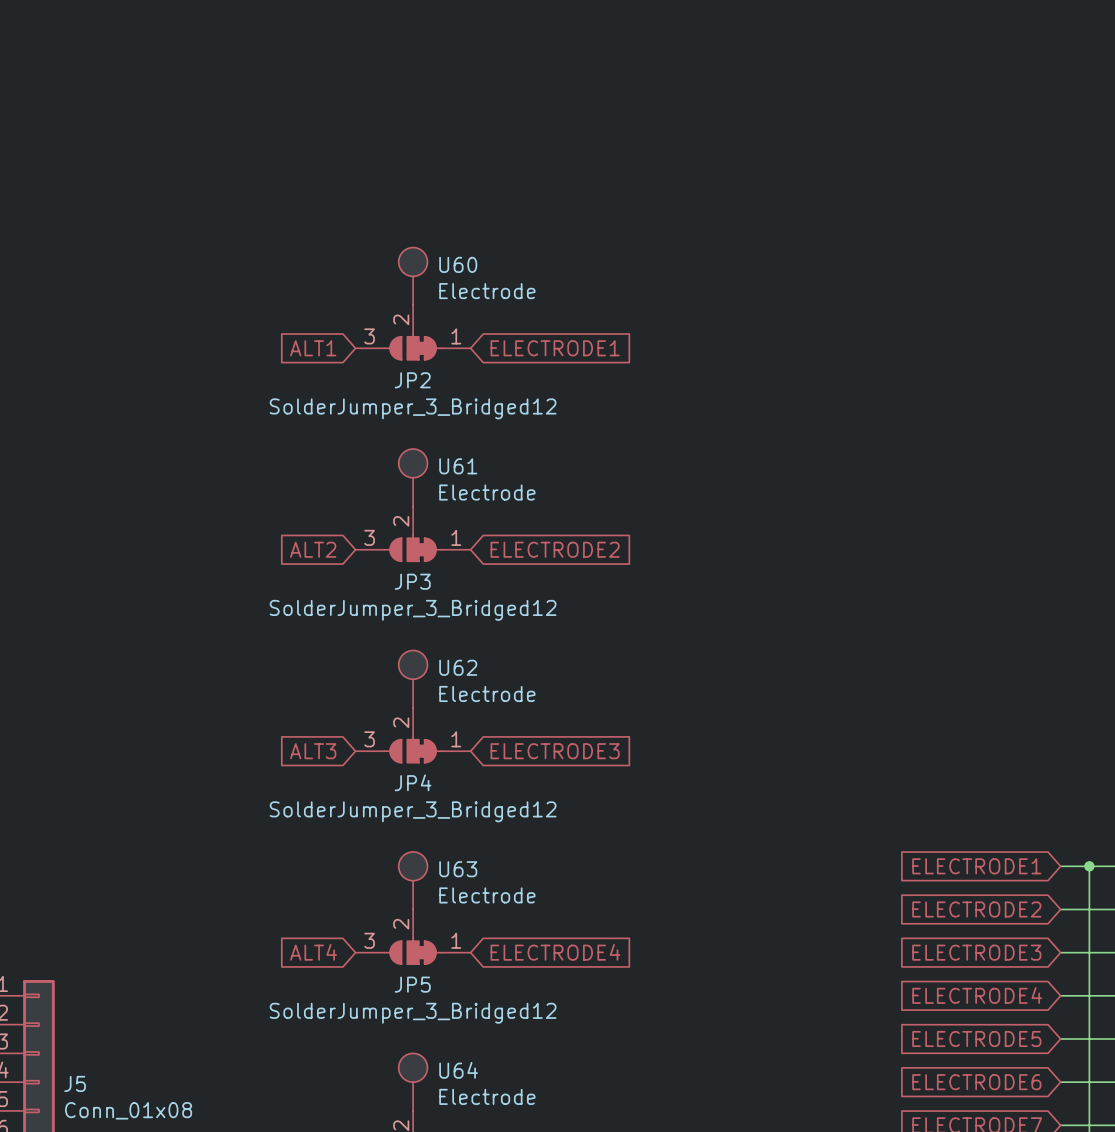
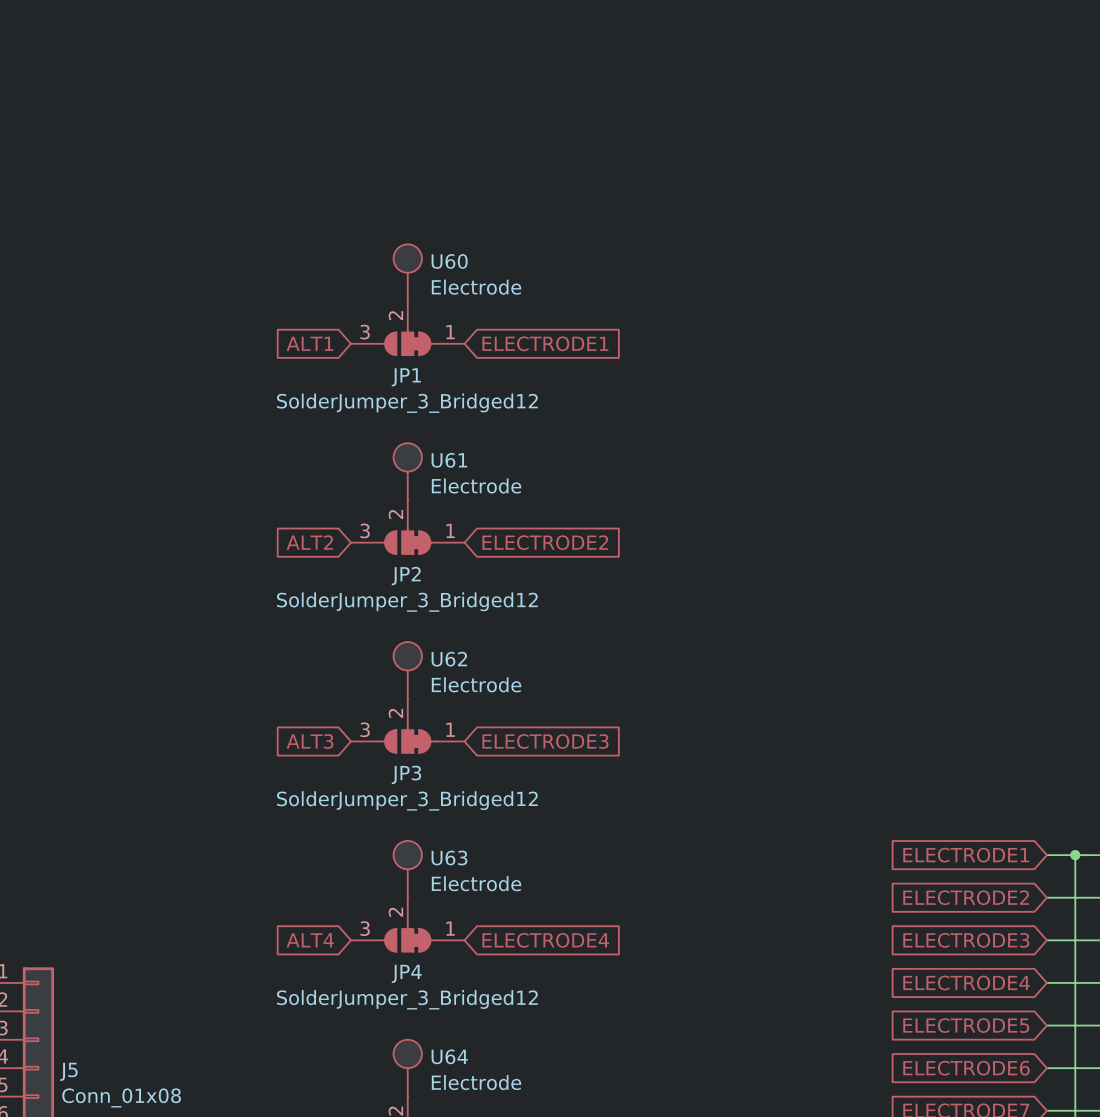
JP2 name: JP2 (412, 380) -> JP1 (406, 377)
JP3 name: JP3 (412, 581) -> JP2 (406, 576)
JP4 name: JP4 (413, 782) -> JP3 (406, 774)
JP5 name: JP5 (412, 984) -> JP4 (406, 973)

